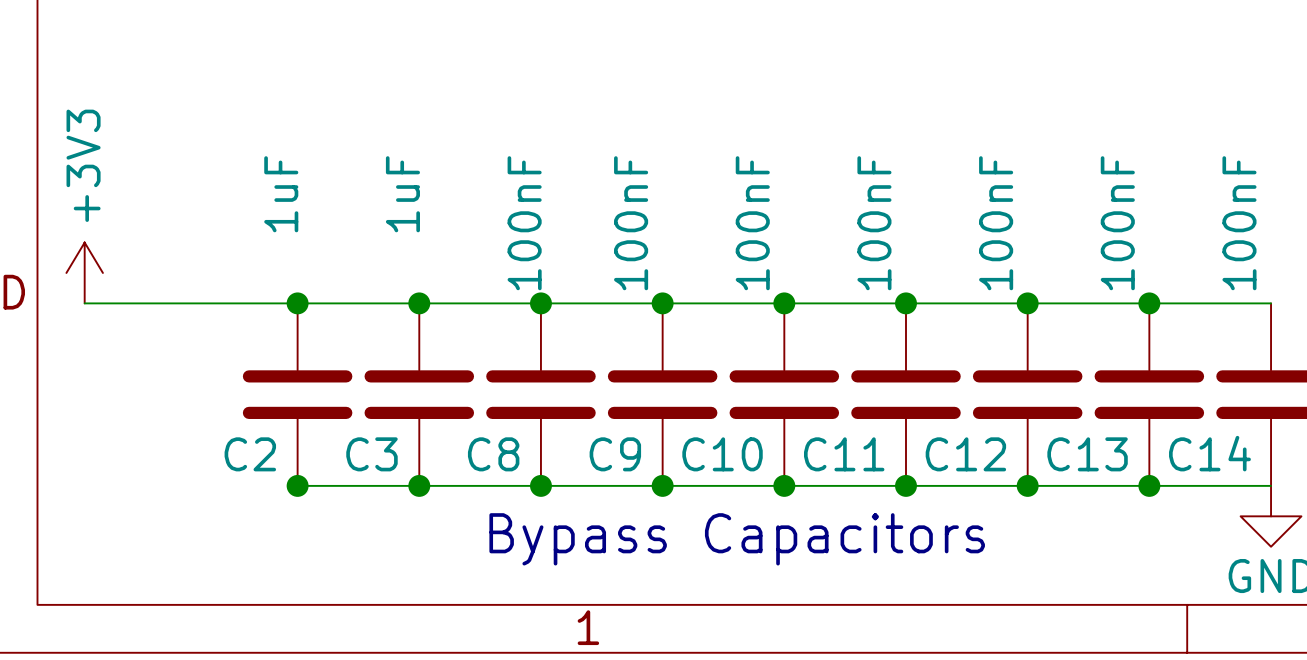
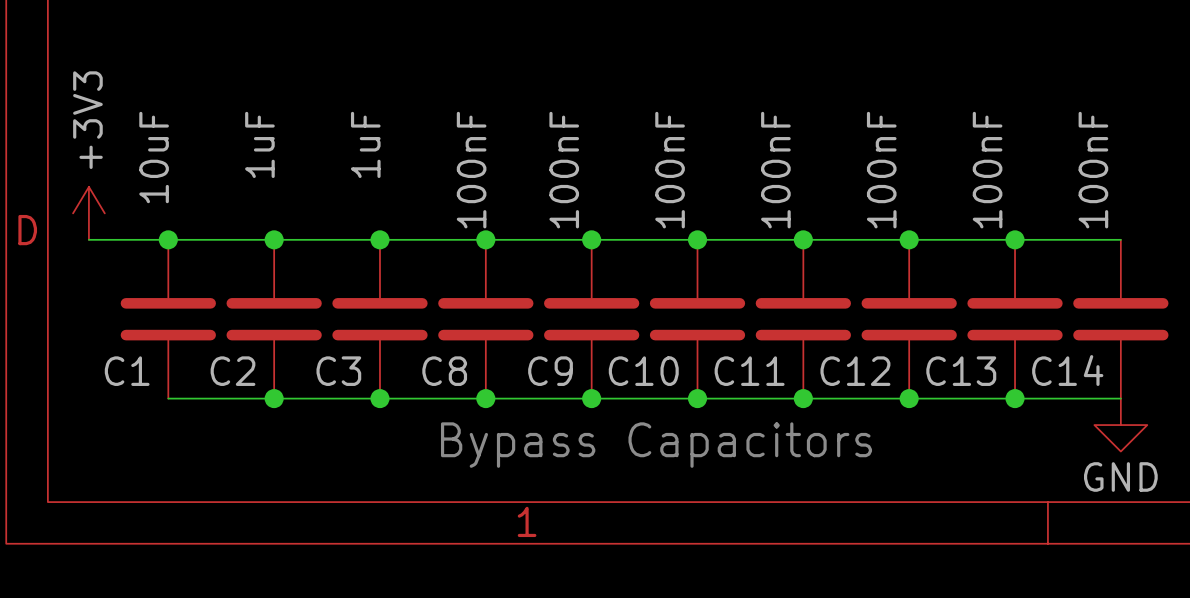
junction: none -> (168, 239)
C1: none -> 10uF (168, 319)
wire: none -> (168, 398) (274, 398)

